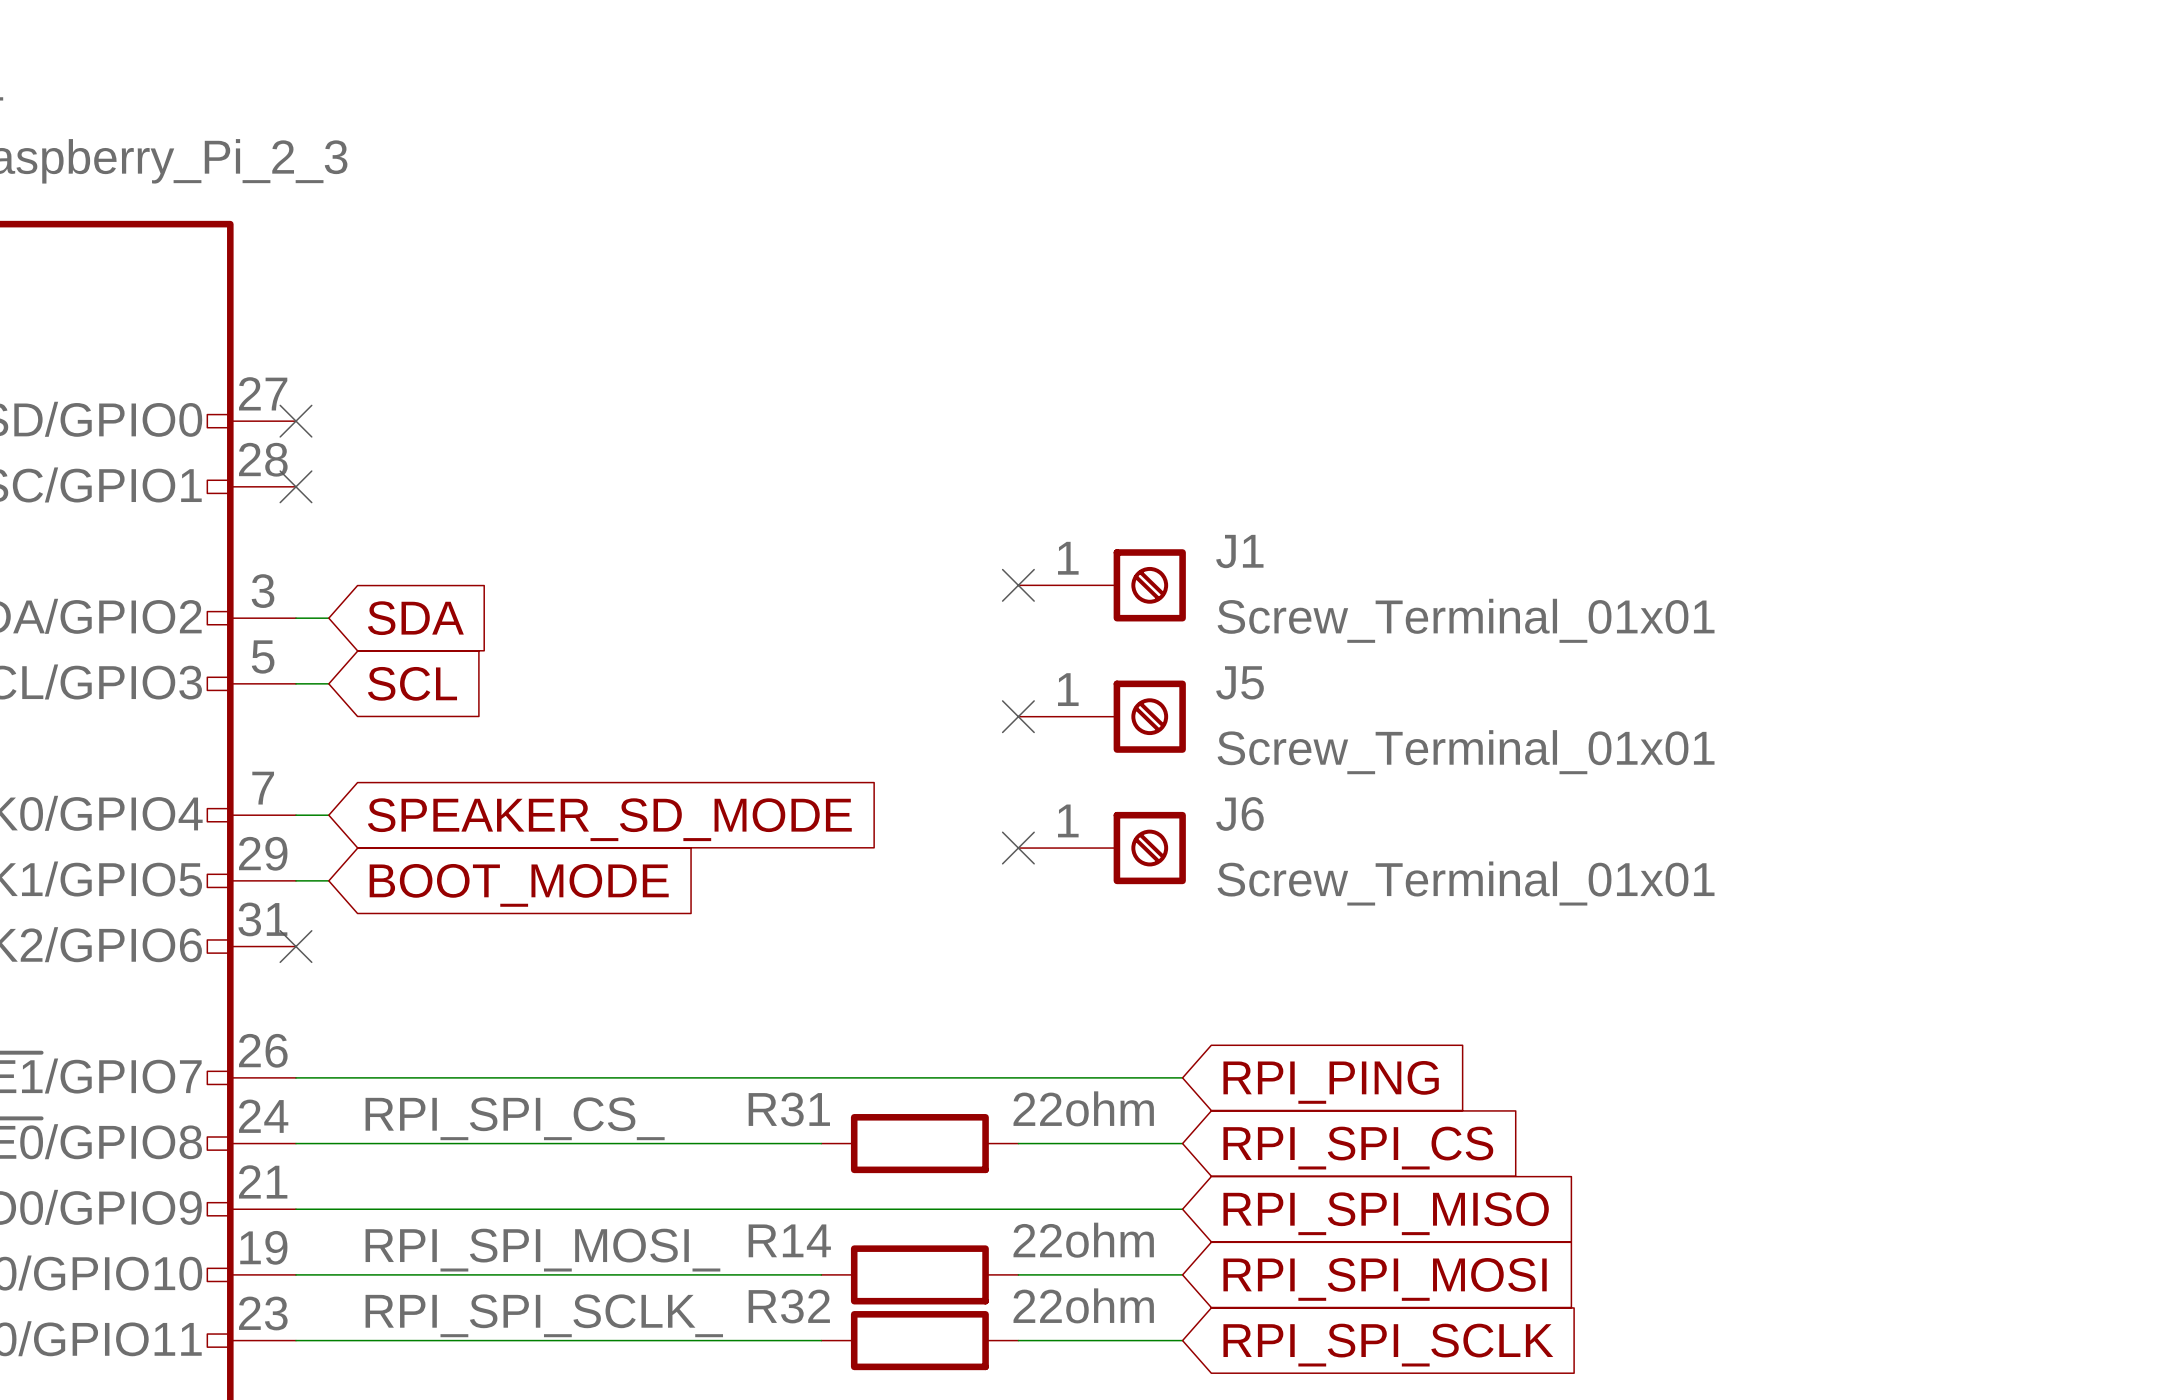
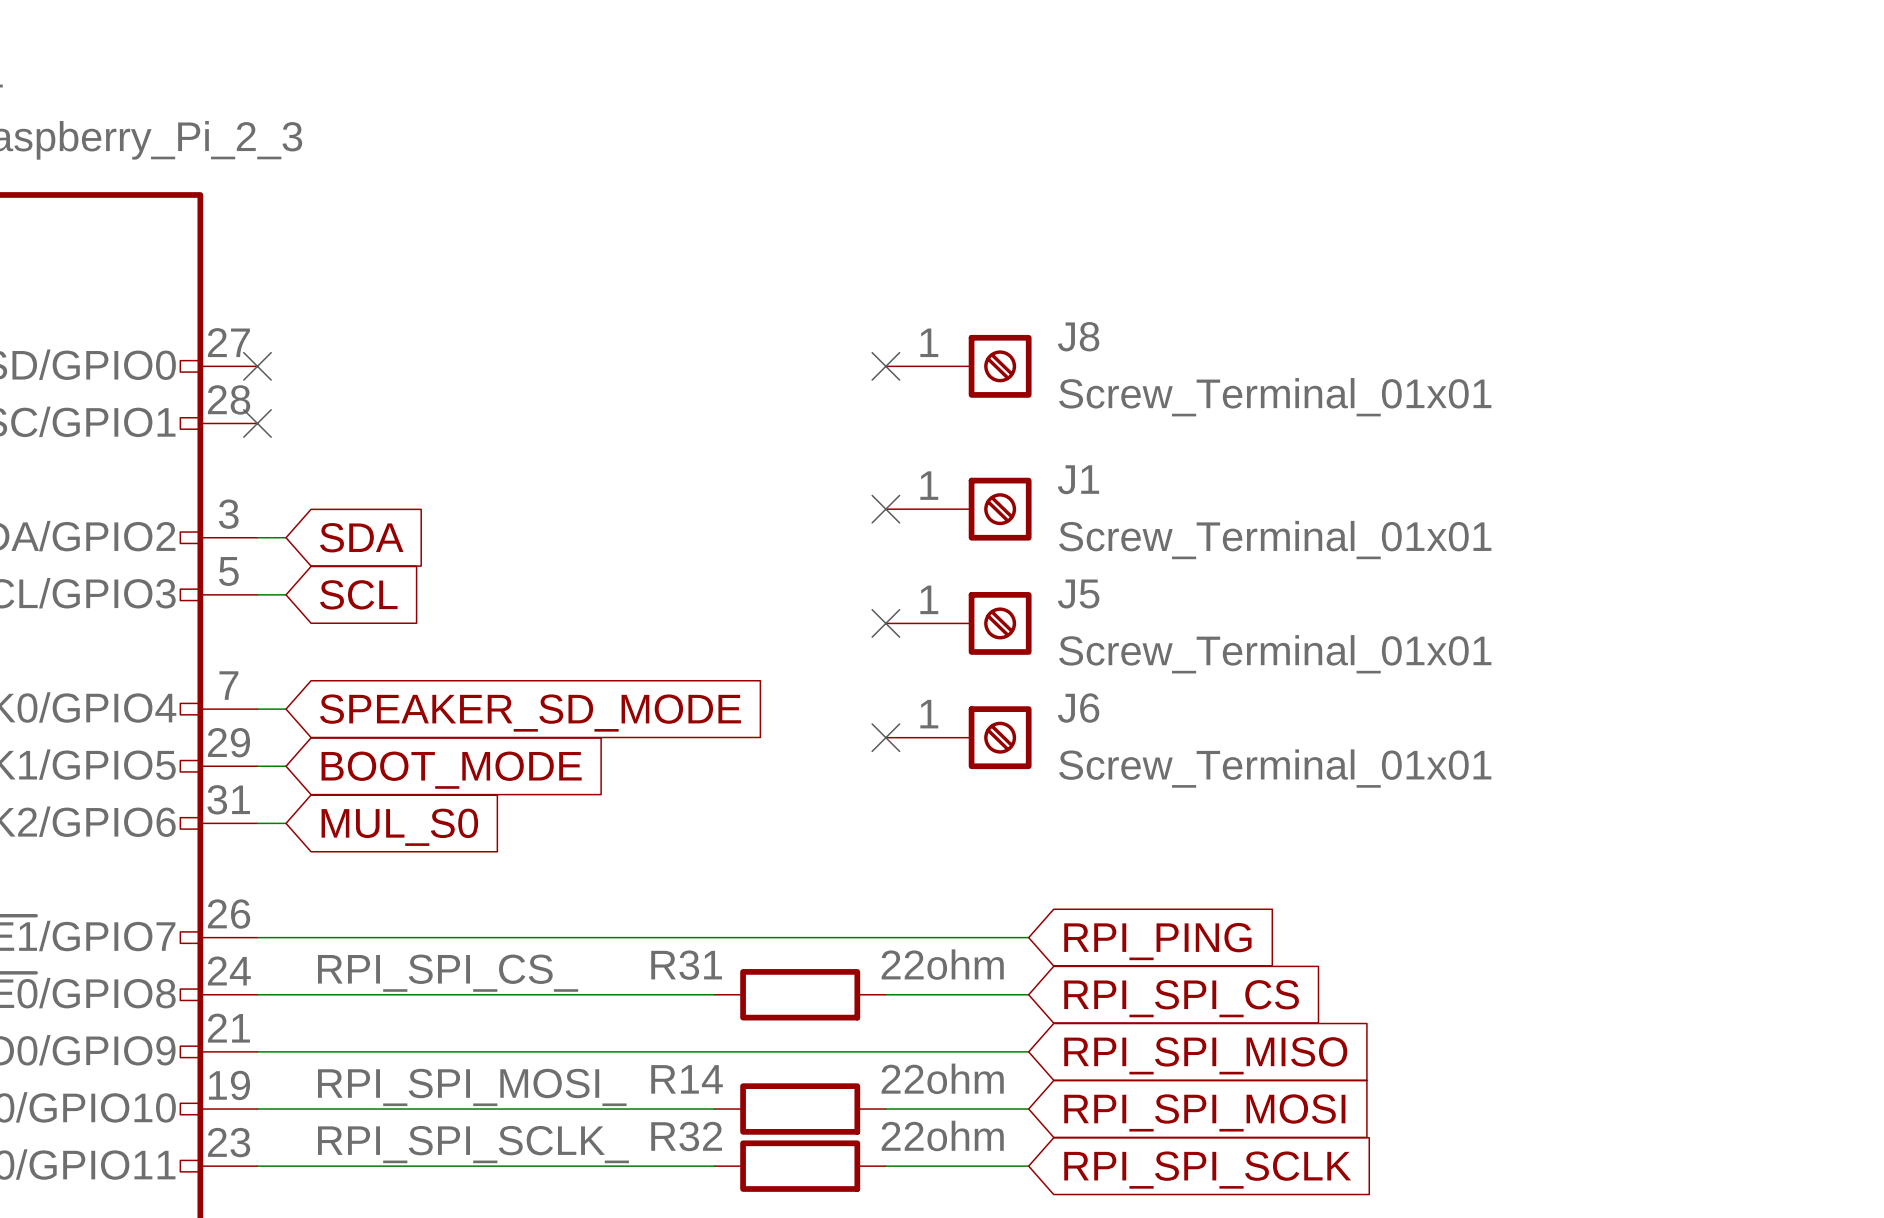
no-connect mark: none -> (885, 366)
J8: none -> Screw_Terminal_01x01 (958, 366)
wire: none -> (257, 823) (286, 823)
no-connect mark: (295, 946) -> none
global label: none -> MUL_S0 (399, 827)

